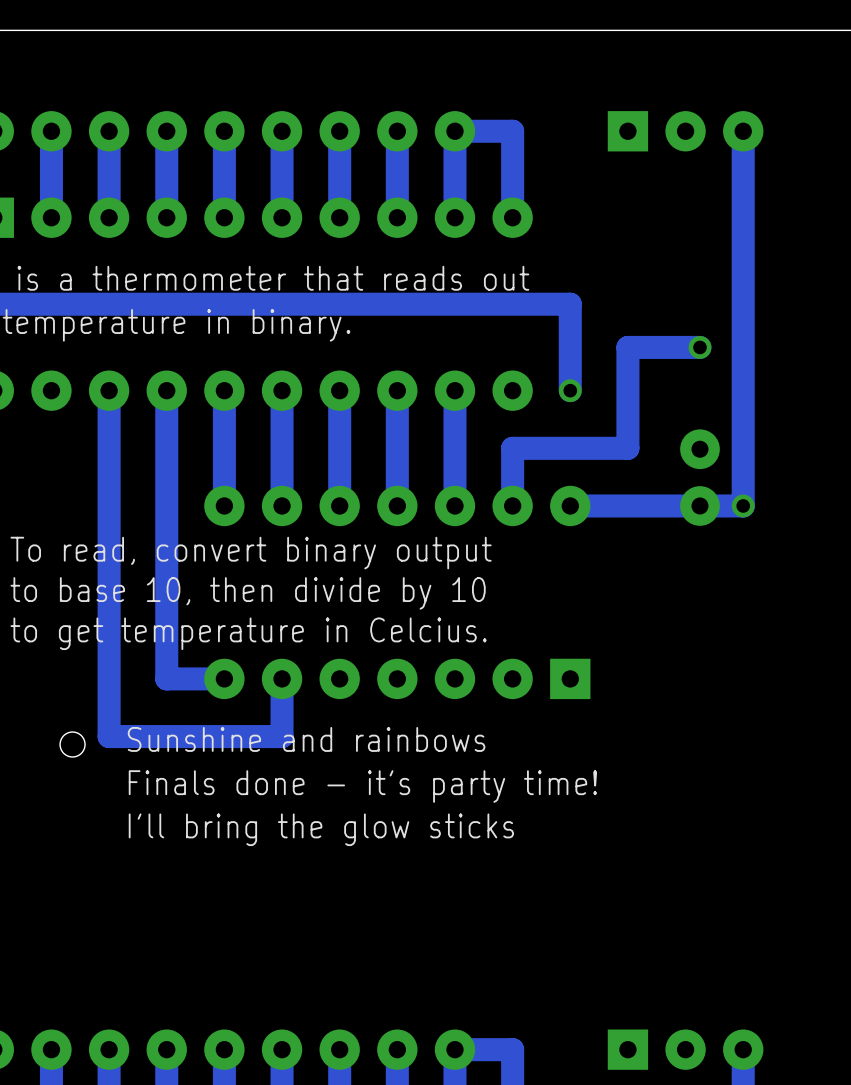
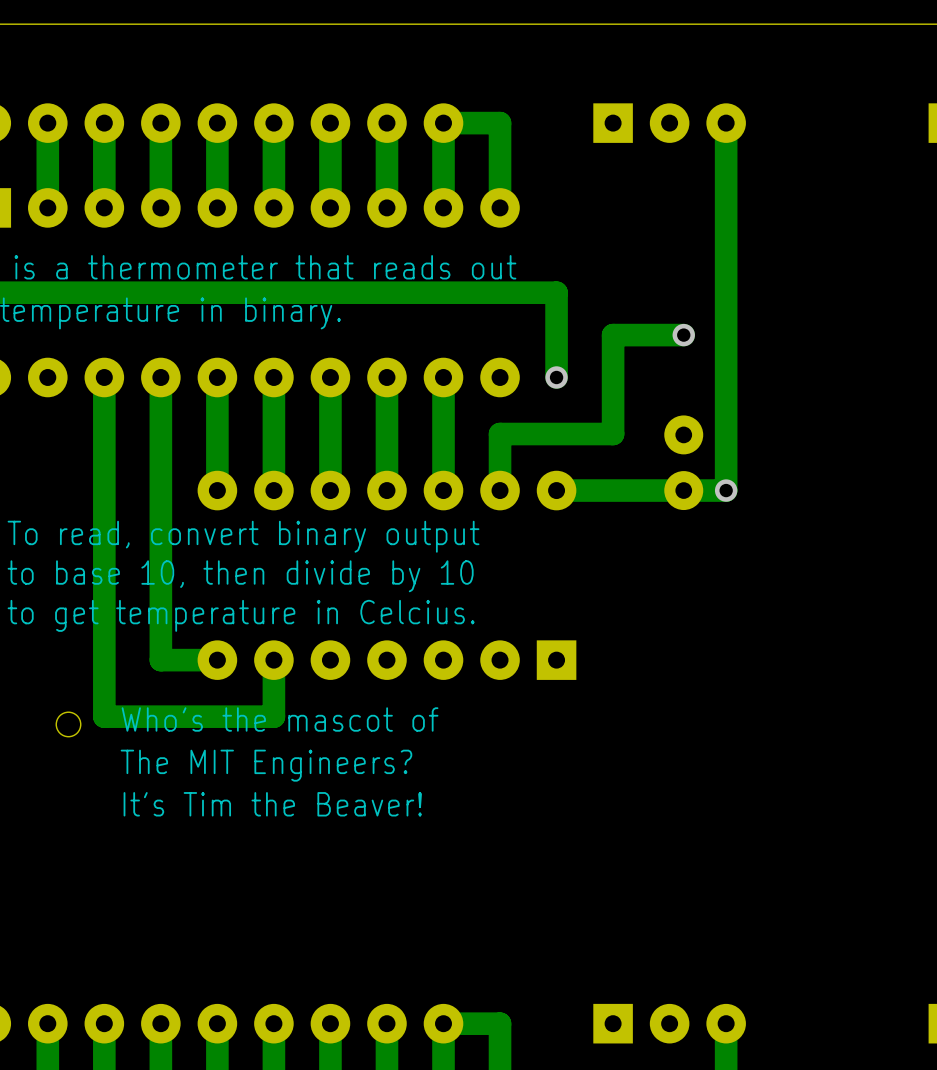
text: Sunshine and rainbows (306, 739) -> Who's the mascot of (280, 719)
text: Finals done - it's party time! (362, 786) -> The MIT Engineers? (266, 765)
text: I'll bring the glow sticks (321, 829) -> It's Tim the Beaver! (272, 804)

